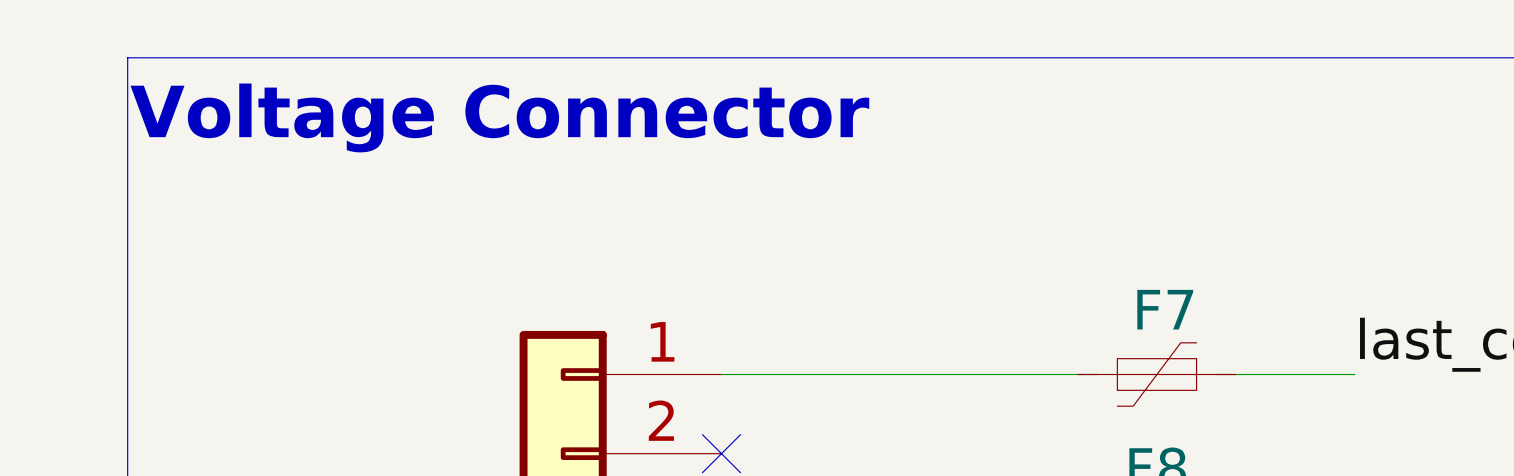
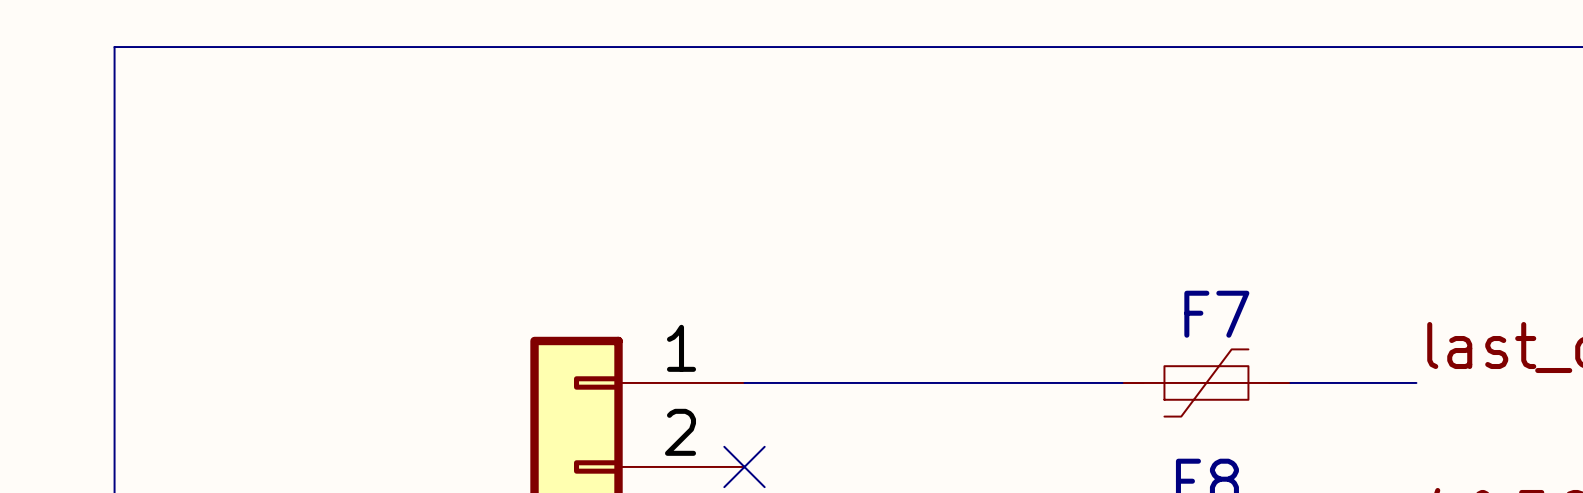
text: Voltage Connector (499, 117) -> none

